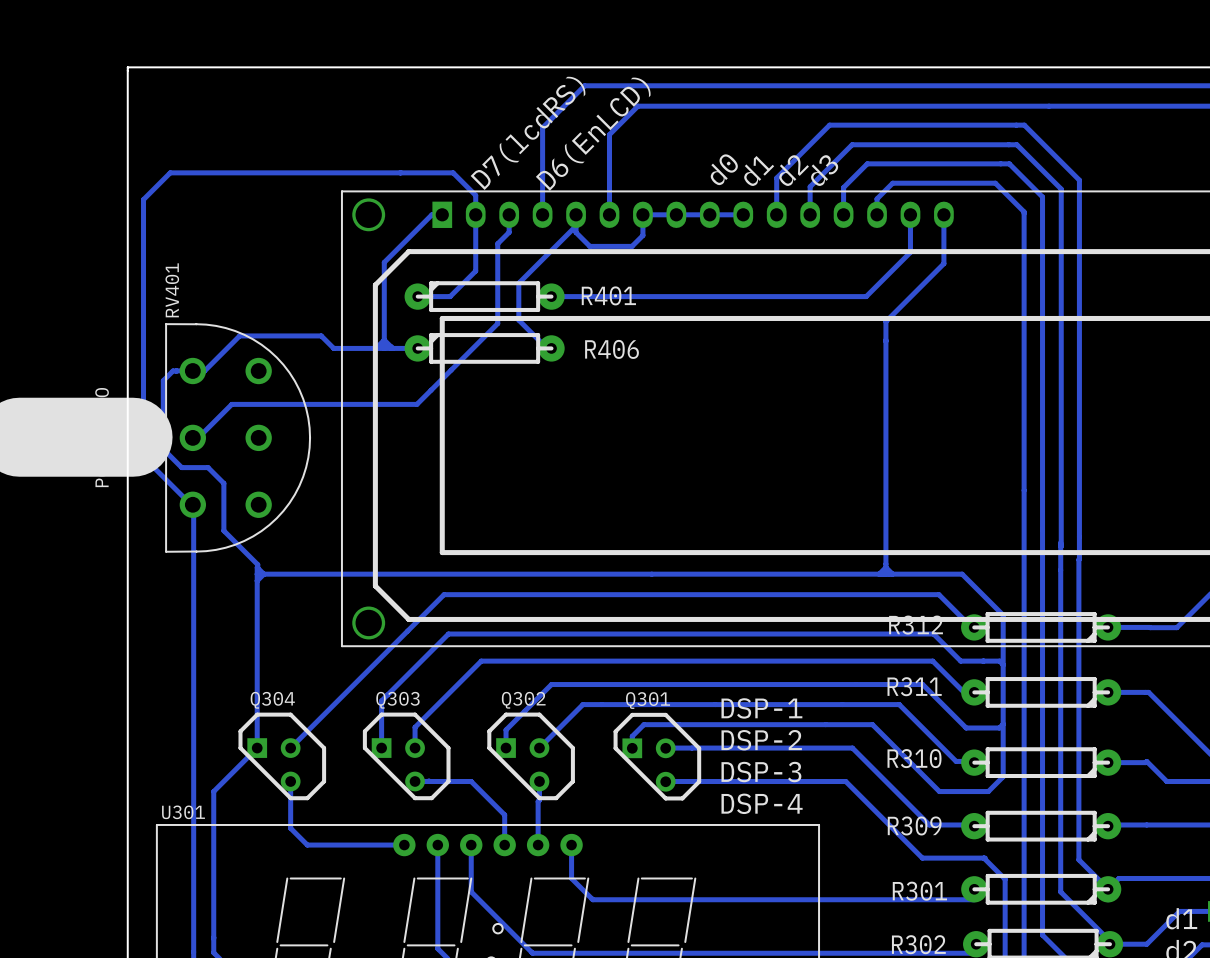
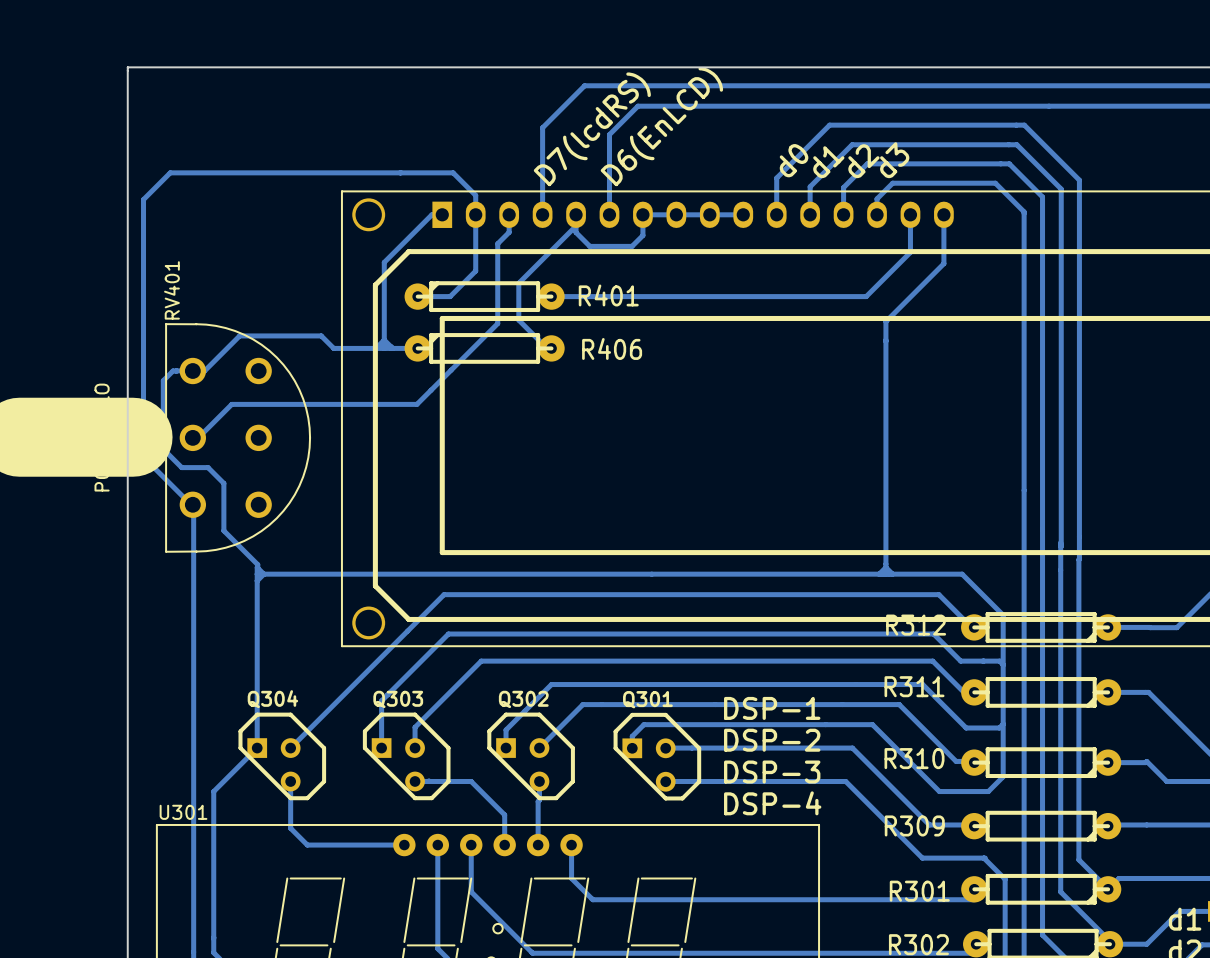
text: none -> D6(EnLCD) (661, 126)
text: D7(lcdRS) (528, 133) -> none
text: D6(EnLCD) (593, 134) -> D7(lcdRS) (592, 129)
text: none -> d3 (894, 160)
text: none -> d2 (863, 161)
text: d0 (724, 169) -> none
text: d2 (793, 170) -> d0 (794, 160)
text: d3 (824, 170) -> d1 (828, 162)
text: d1 (759, 171) -> none

